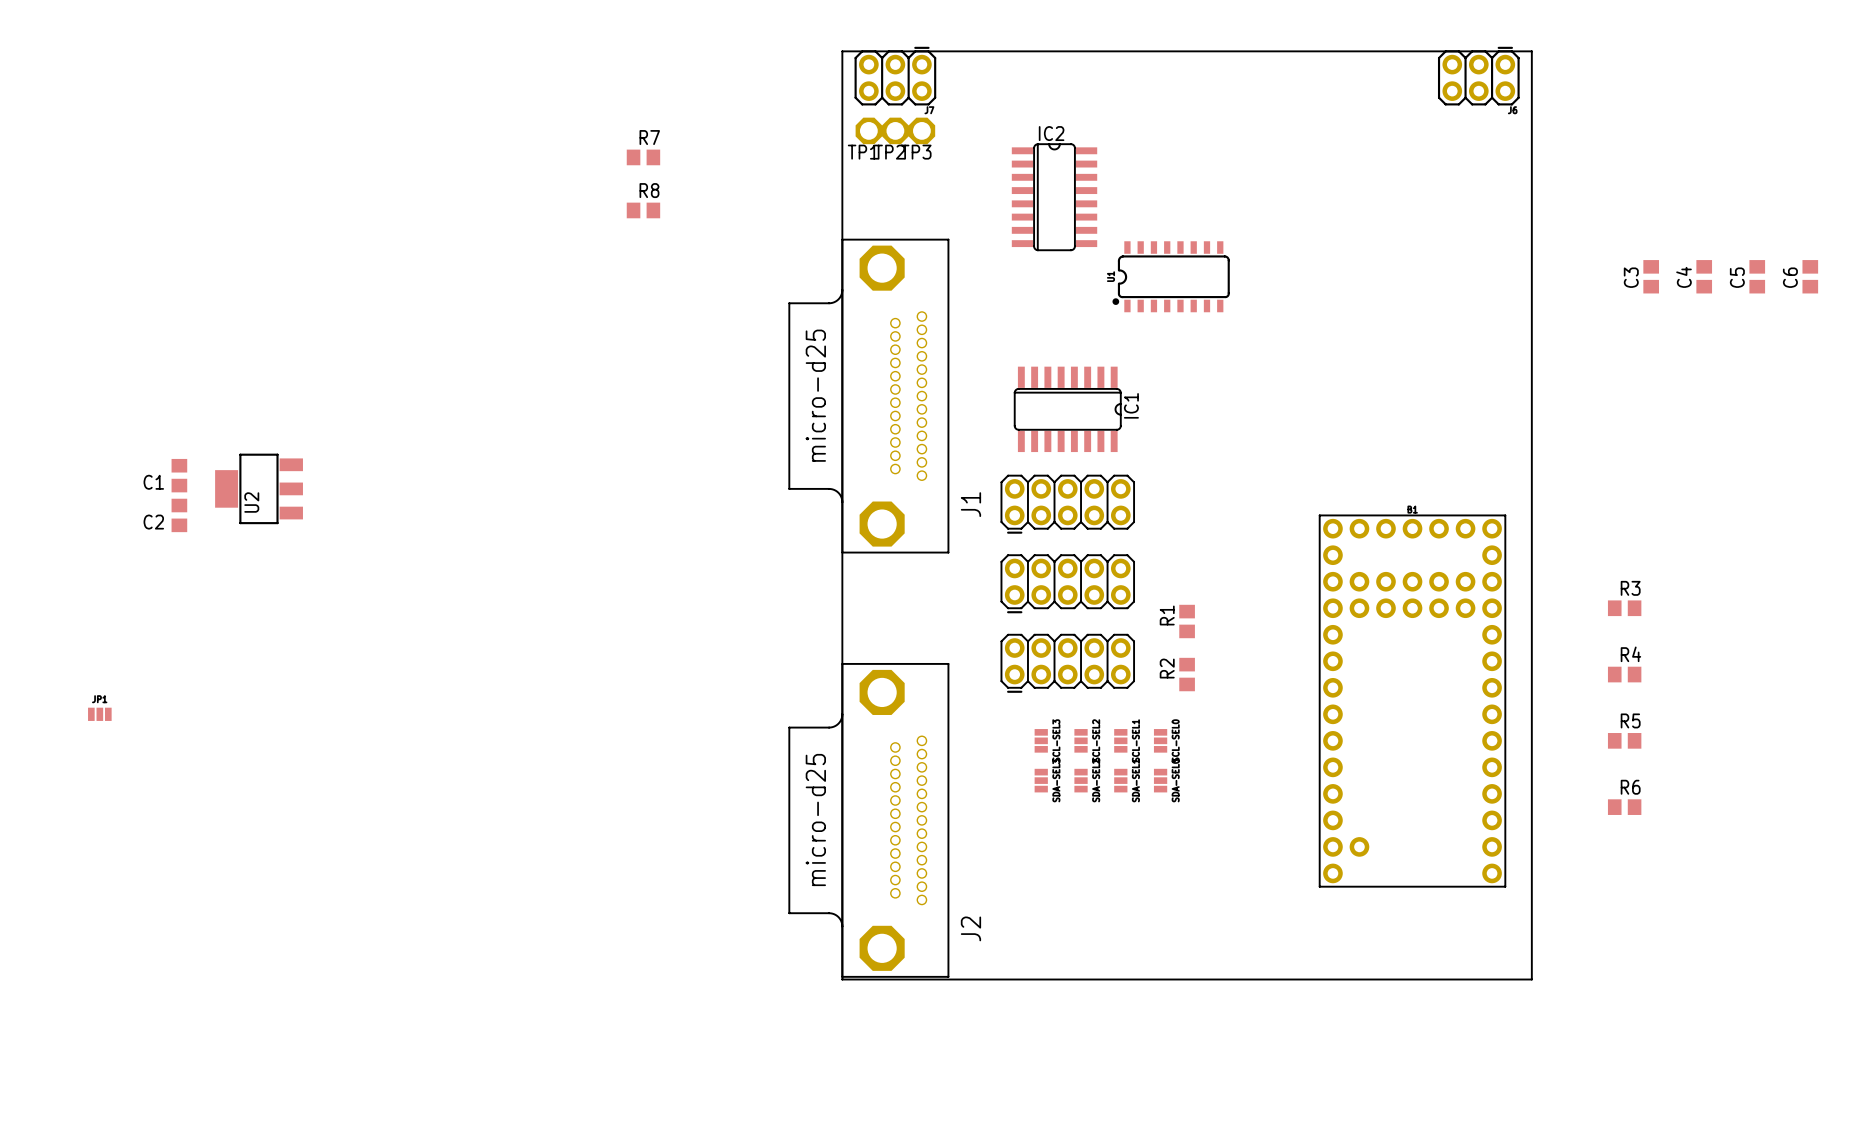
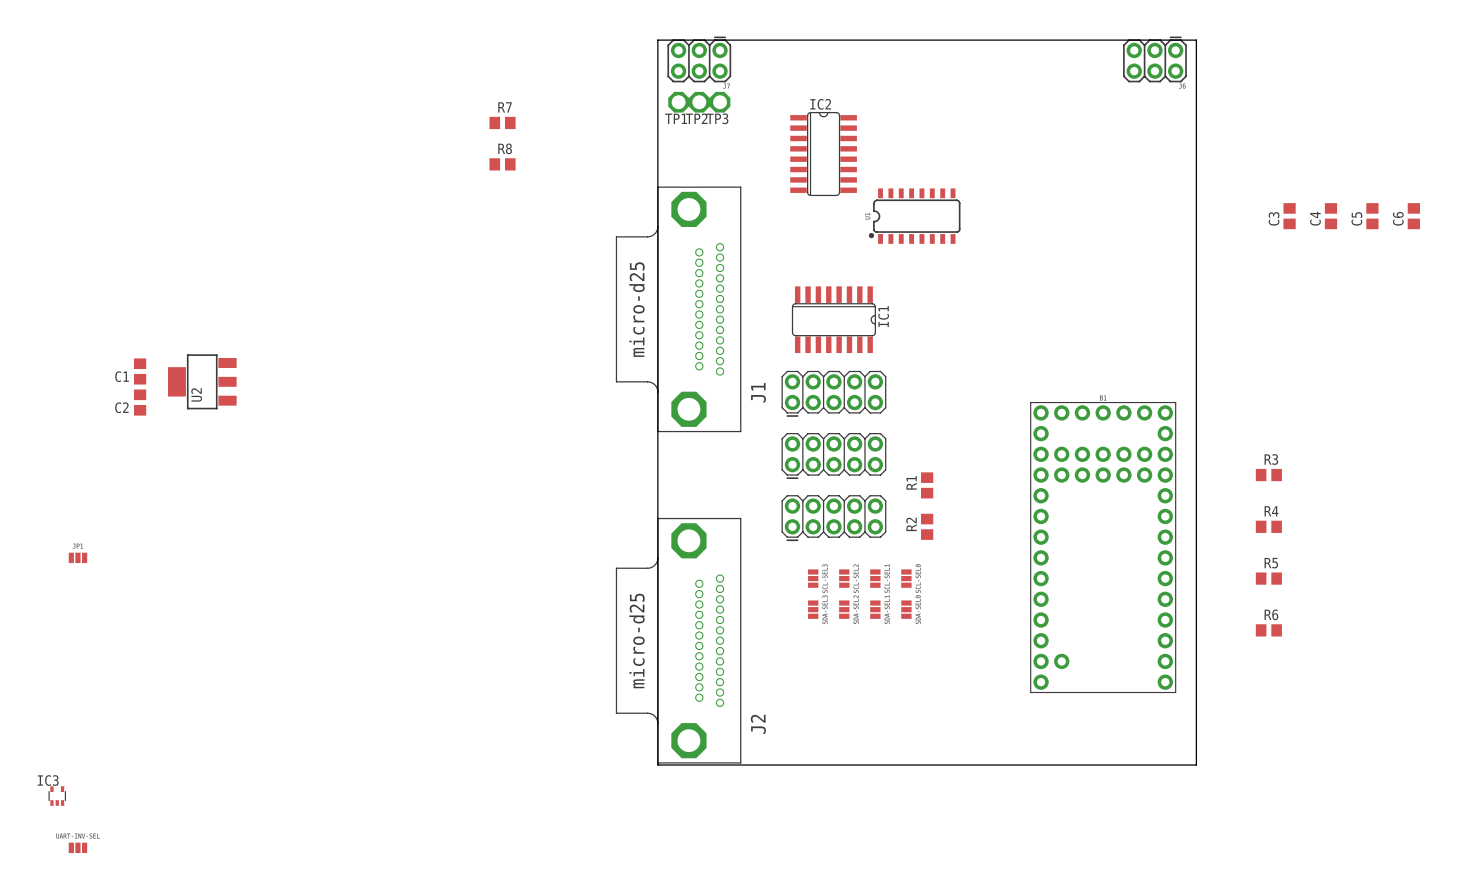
IC3: none -> (57, 796)
part: none -> (77, 847)

